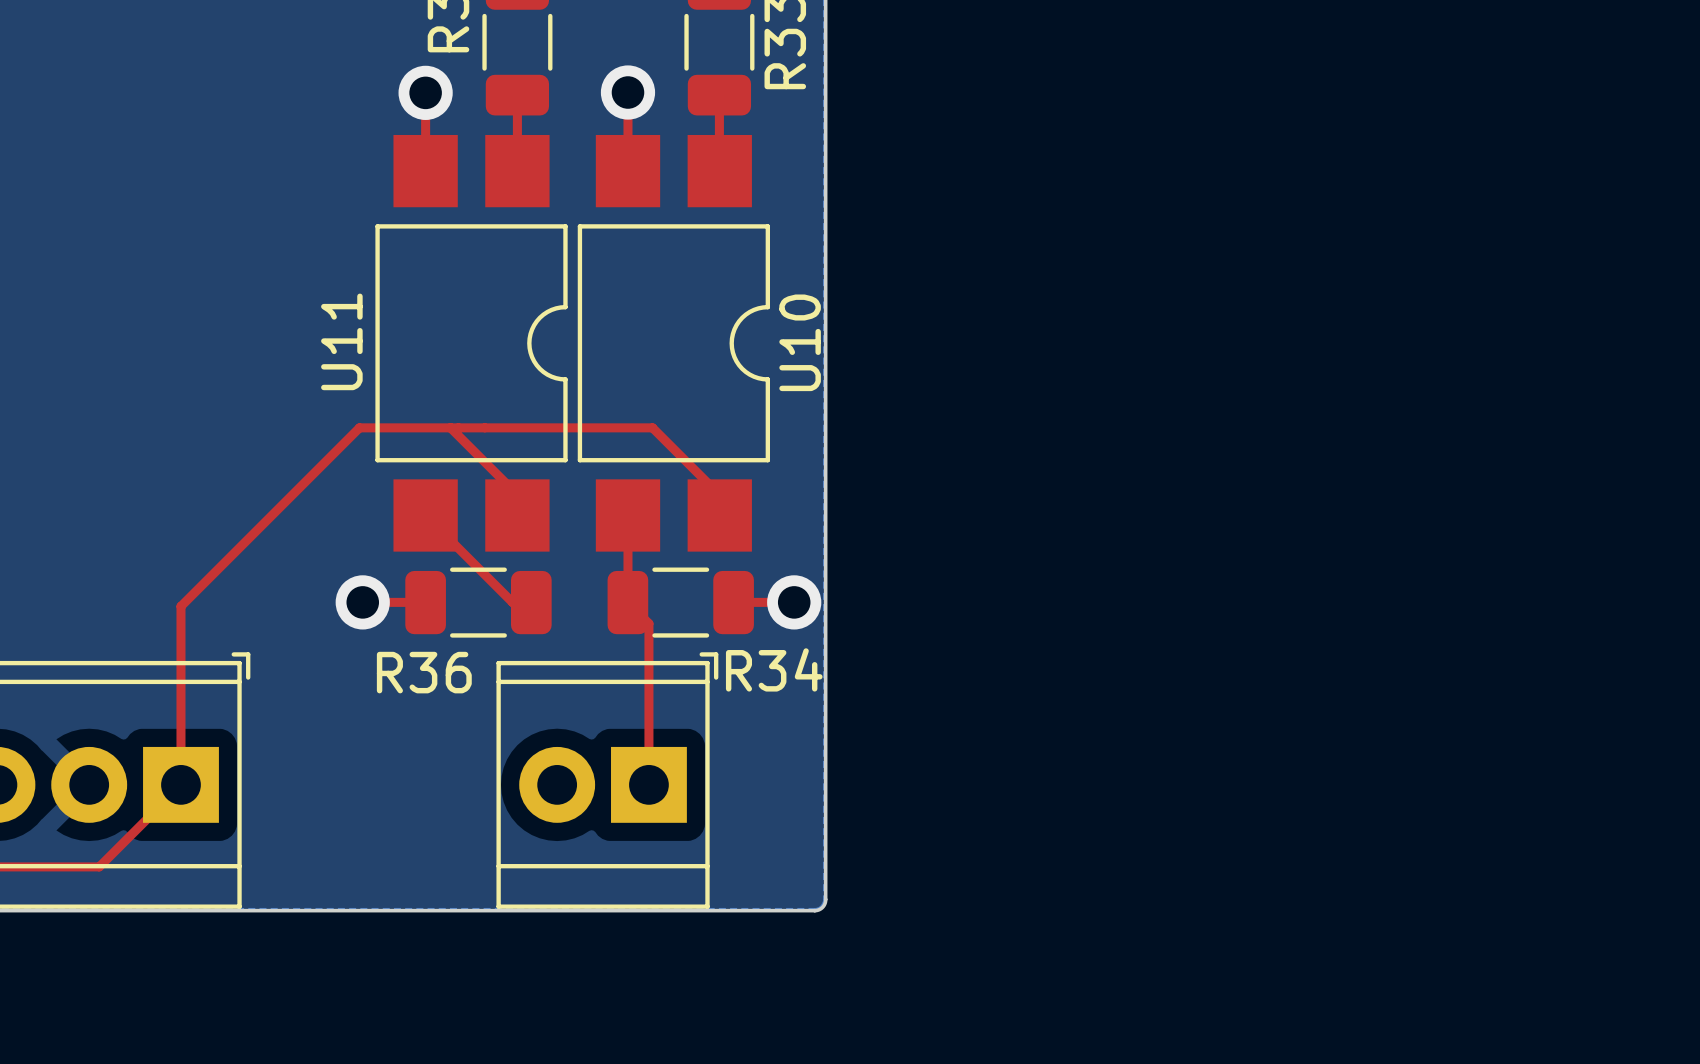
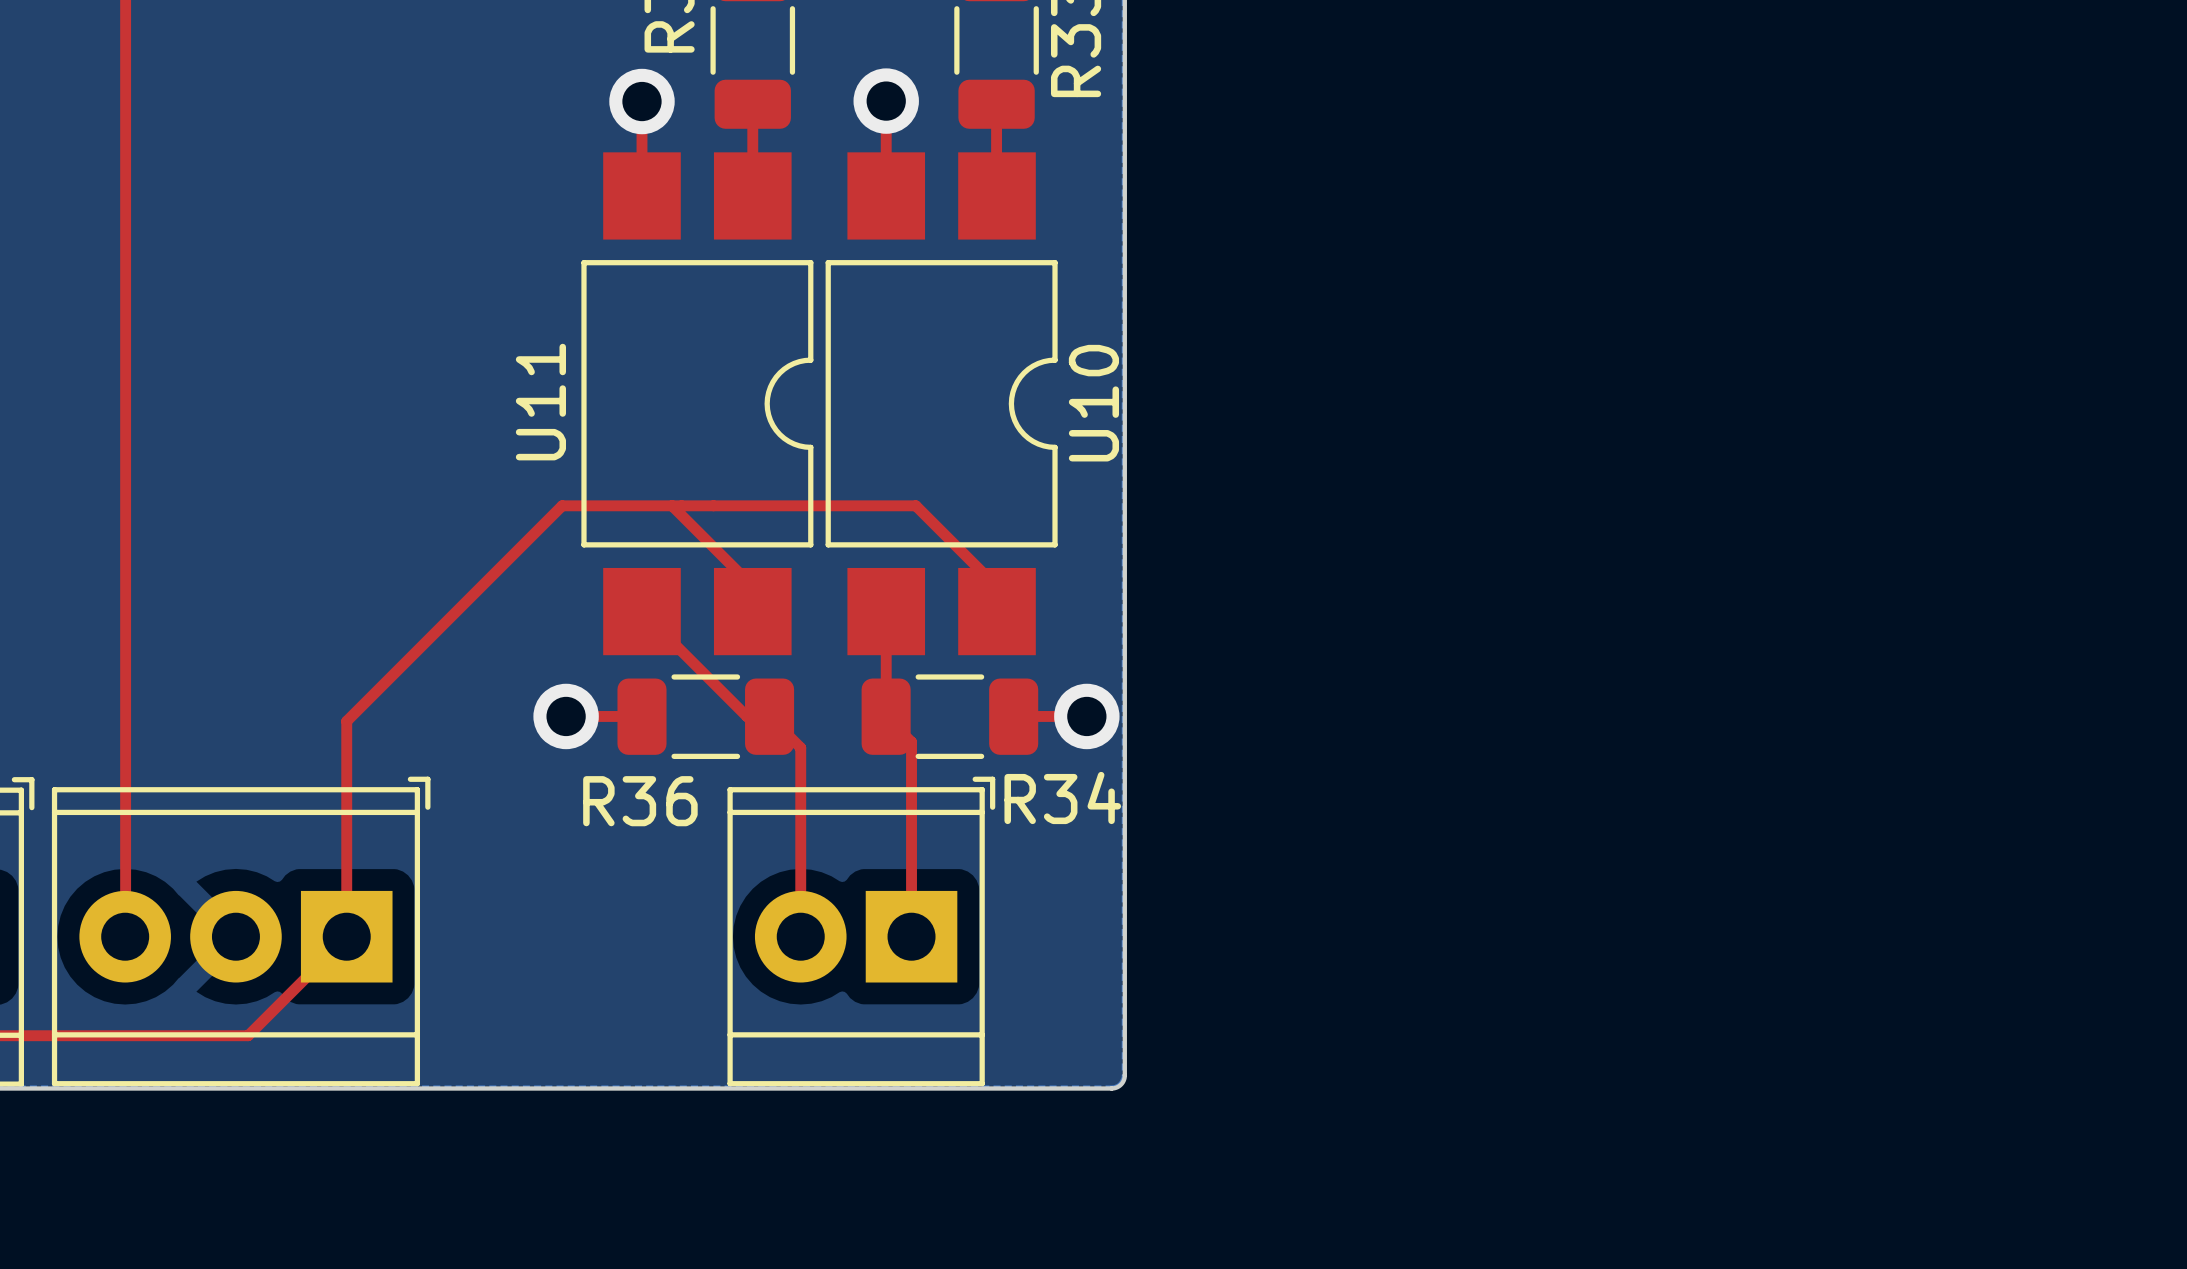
top track: none -> (769, 716) (800, 747) (800, 936)

